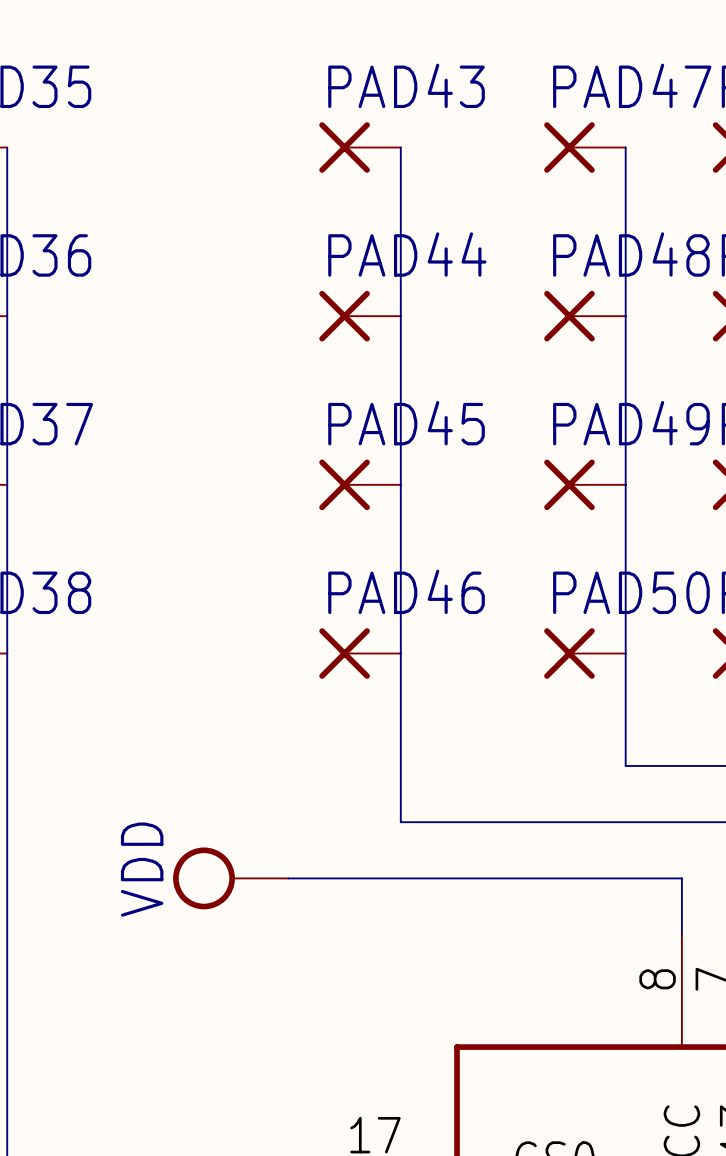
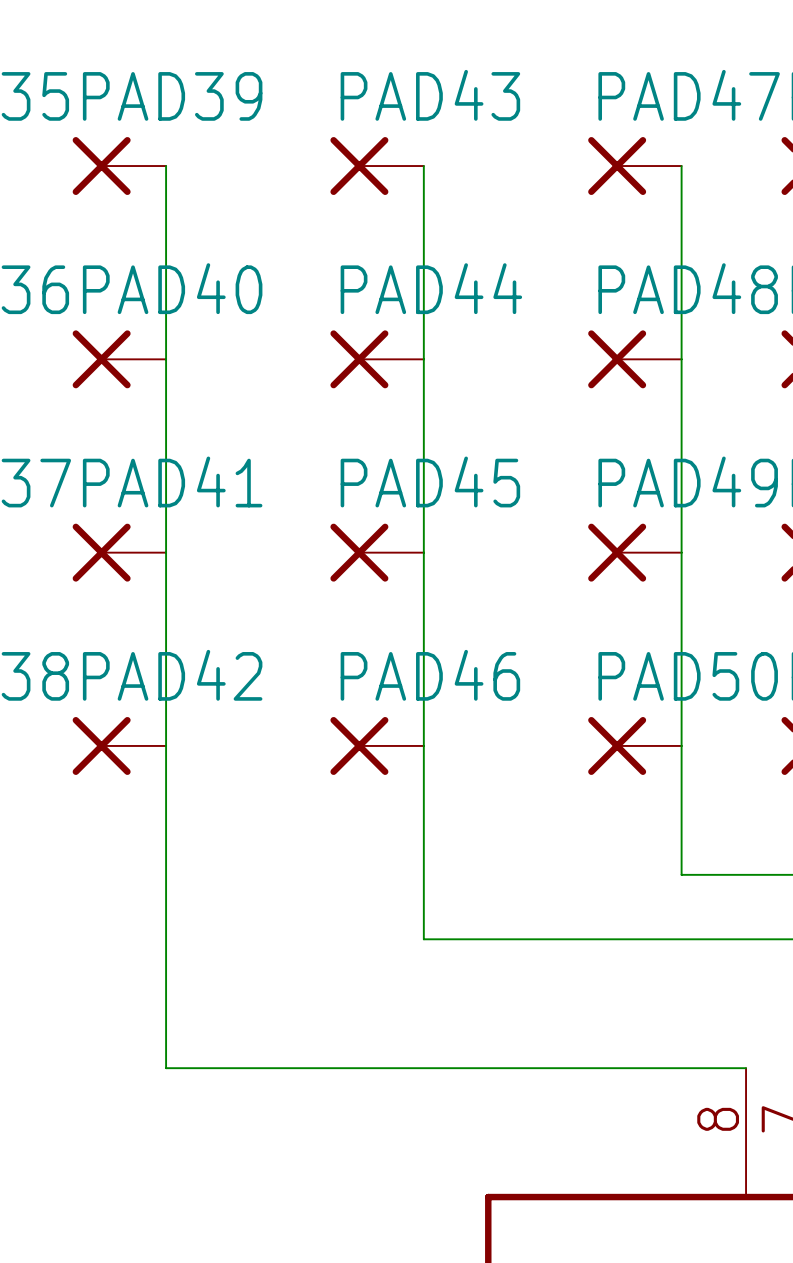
PAD39: none -> (119, 166)
PAD40: none -> (119, 359)
PAD41: none -> (119, 552)
PAD42: none -> (119, 745)
power symbol: VDD (230, 878) -> none
wire: (288, 878) (681, 878) (681, 934) -> (166, 166) (166, 1068) (746, 1068)

